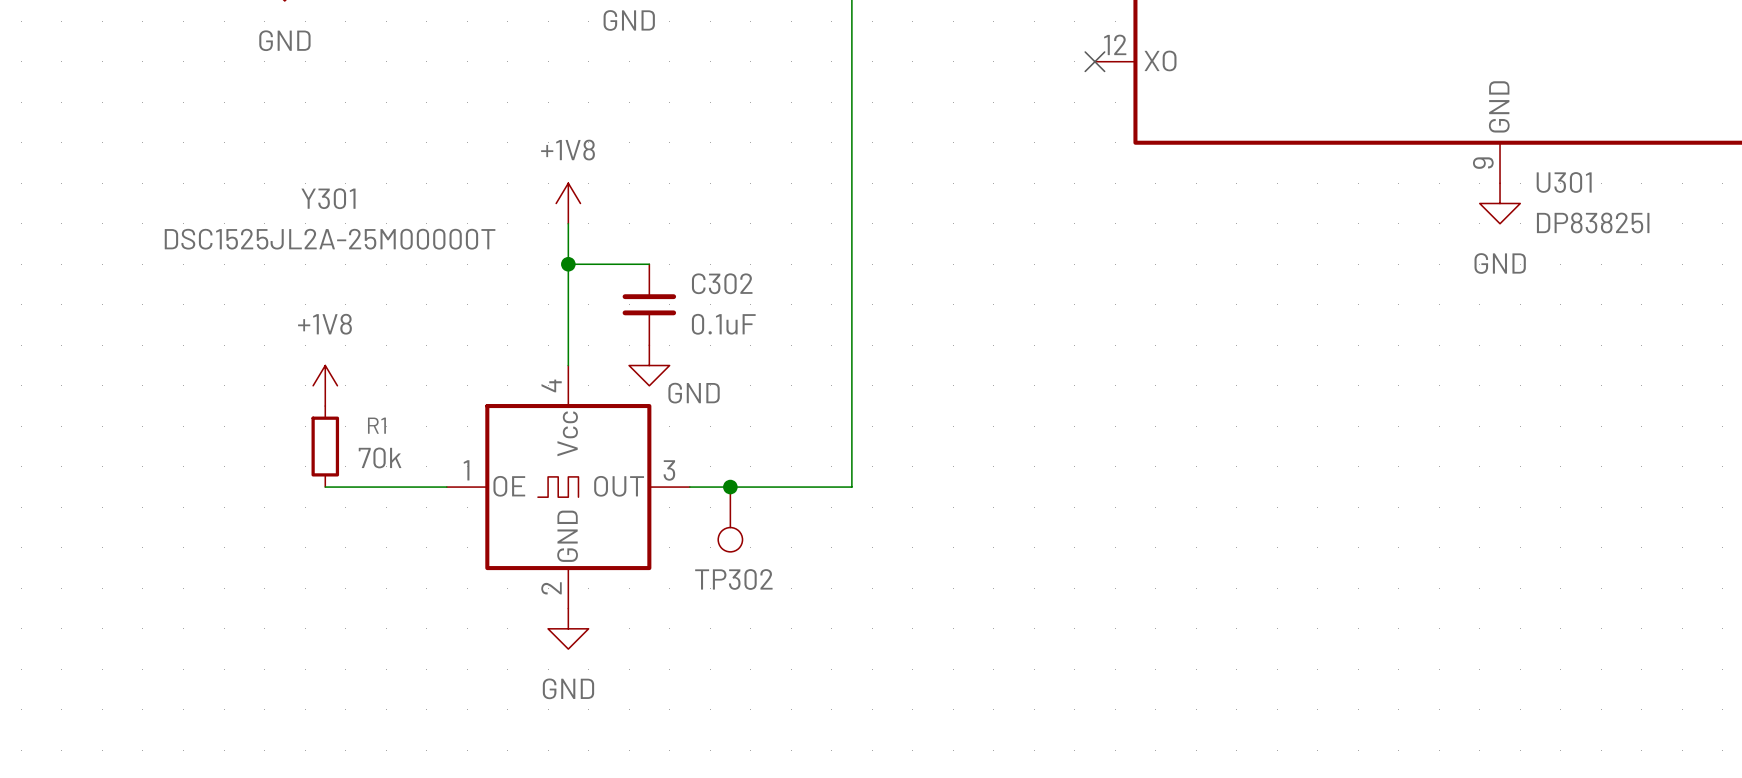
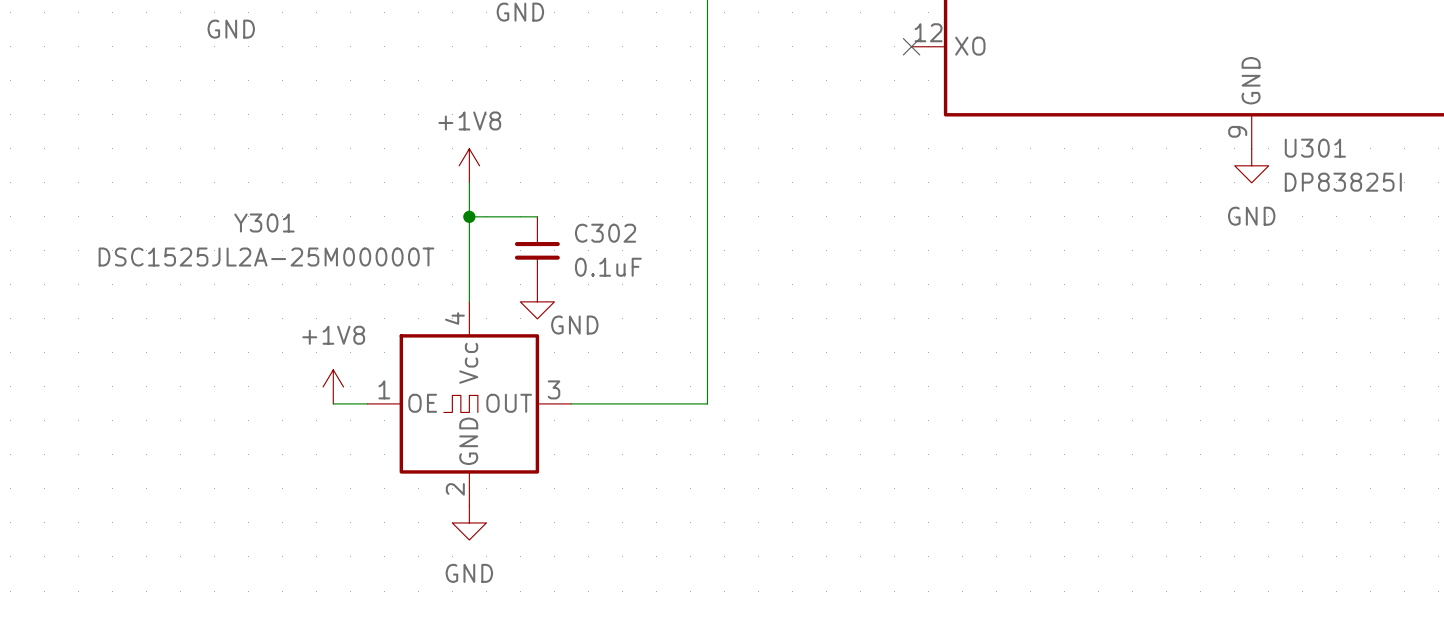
Y301 name position: Y301 (328, 198) -> Y301 (264, 223)
Y301 value position: DSC1525JL2A-25M00000T (330, 239) -> DSC1525JL2A-25M00000T (266, 257)
power symbol position: +1V8 (325, 385) -> +1V8 (333, 386)
R1: 70k (325, 446) -> none
wire: (325, 487) (406, 487) -> none
junction: (730, 487) -> none
TP302: (730, 519) -> none

